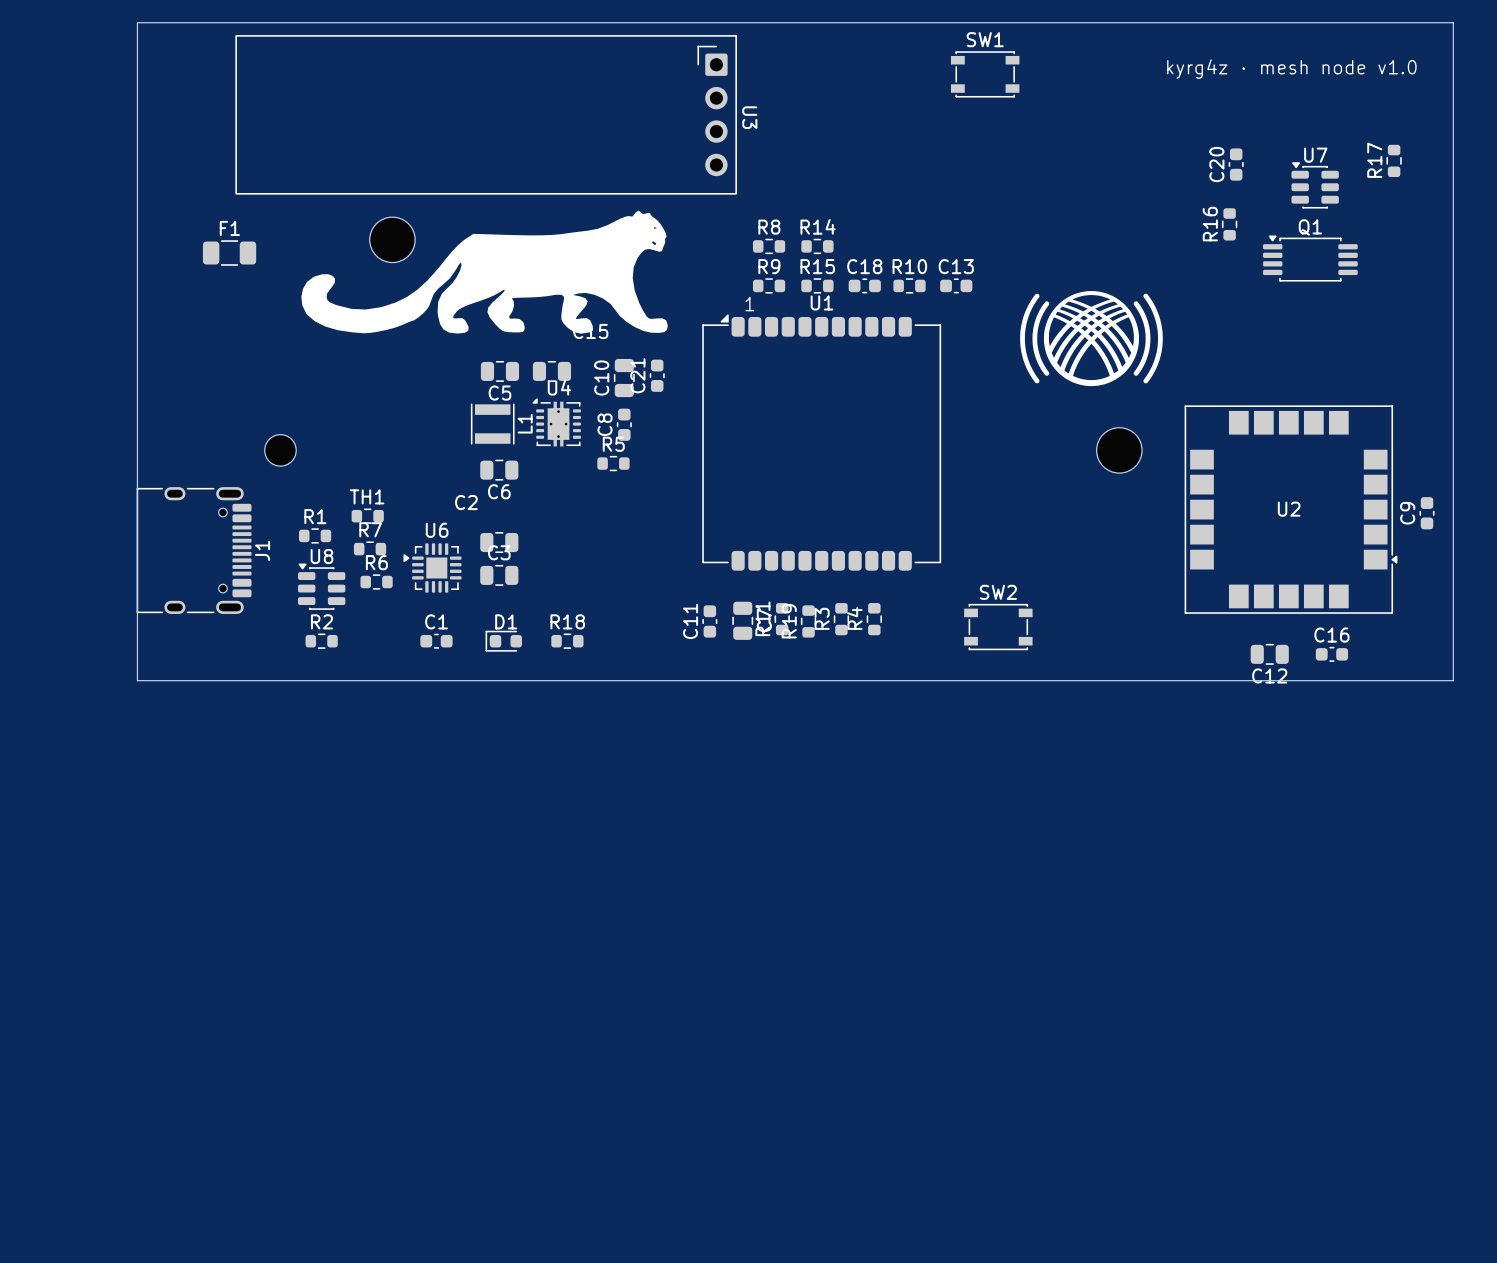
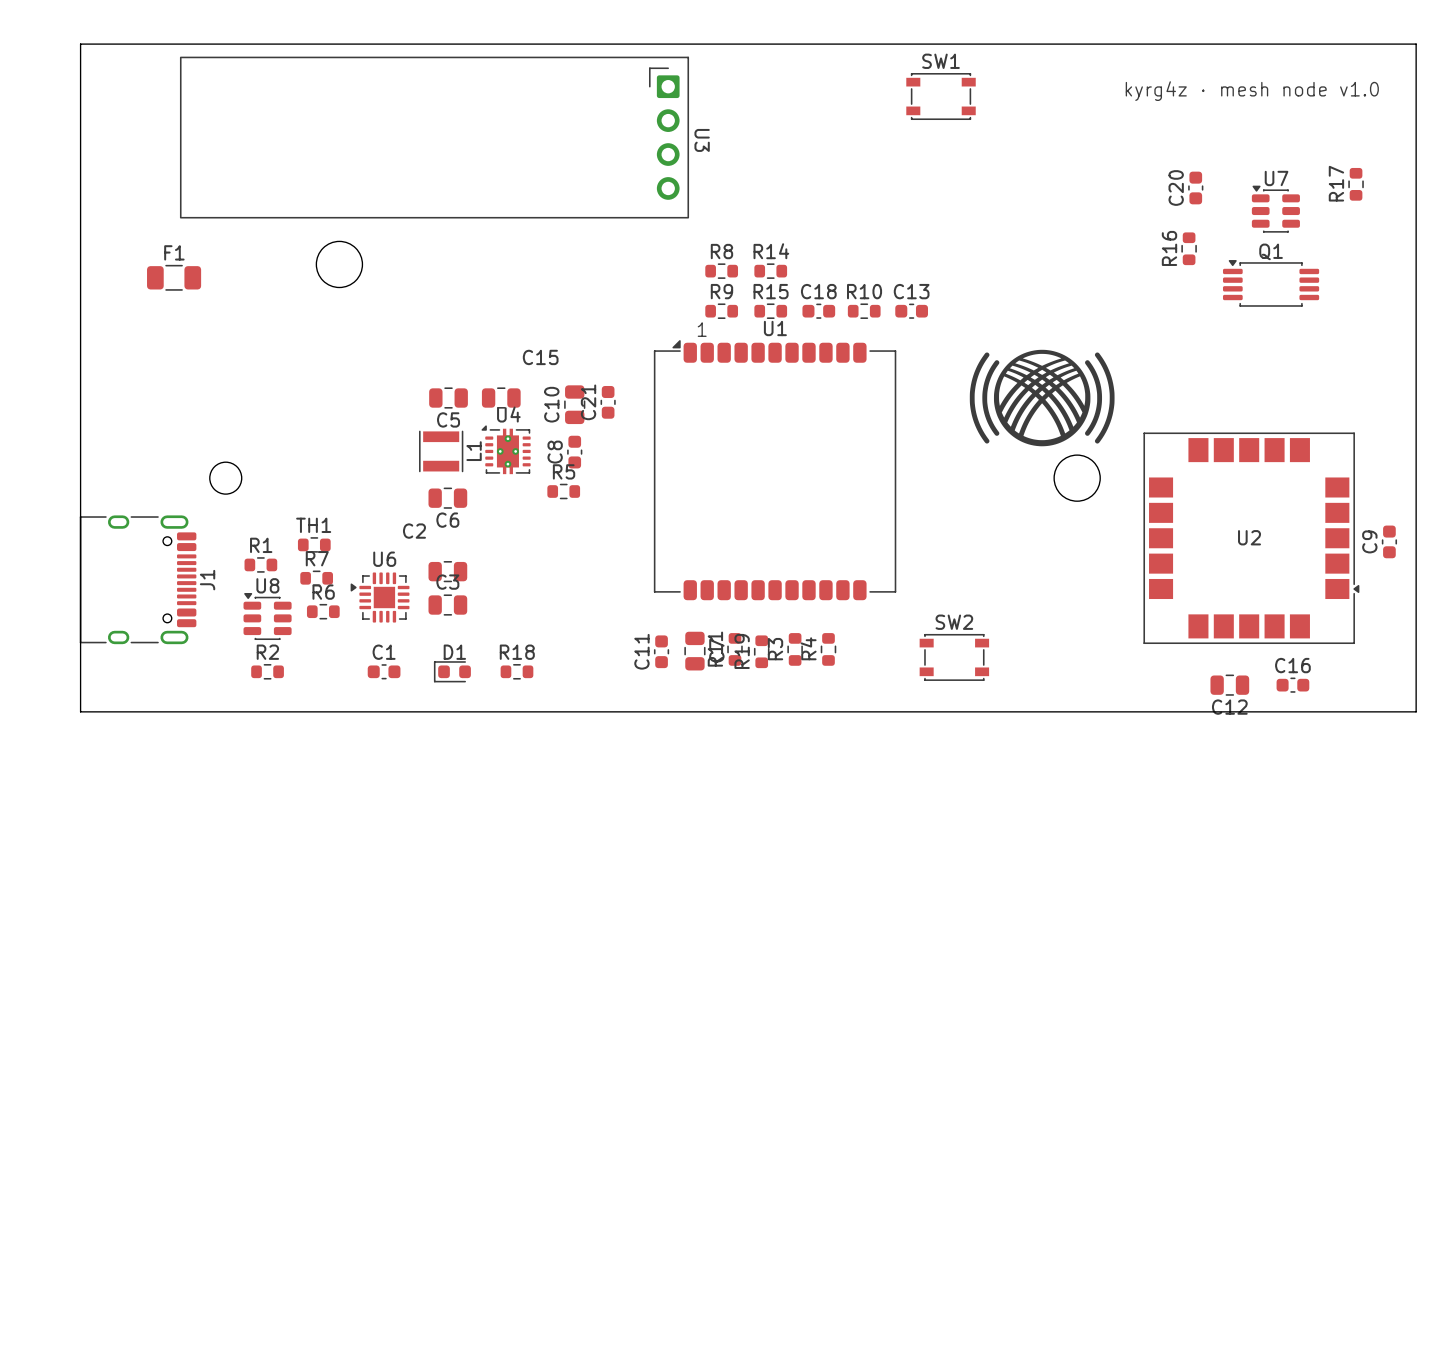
drawing: [301, 210, 668, 334] -> none
drawing position: (1091, 338) -> (1042, 398)

